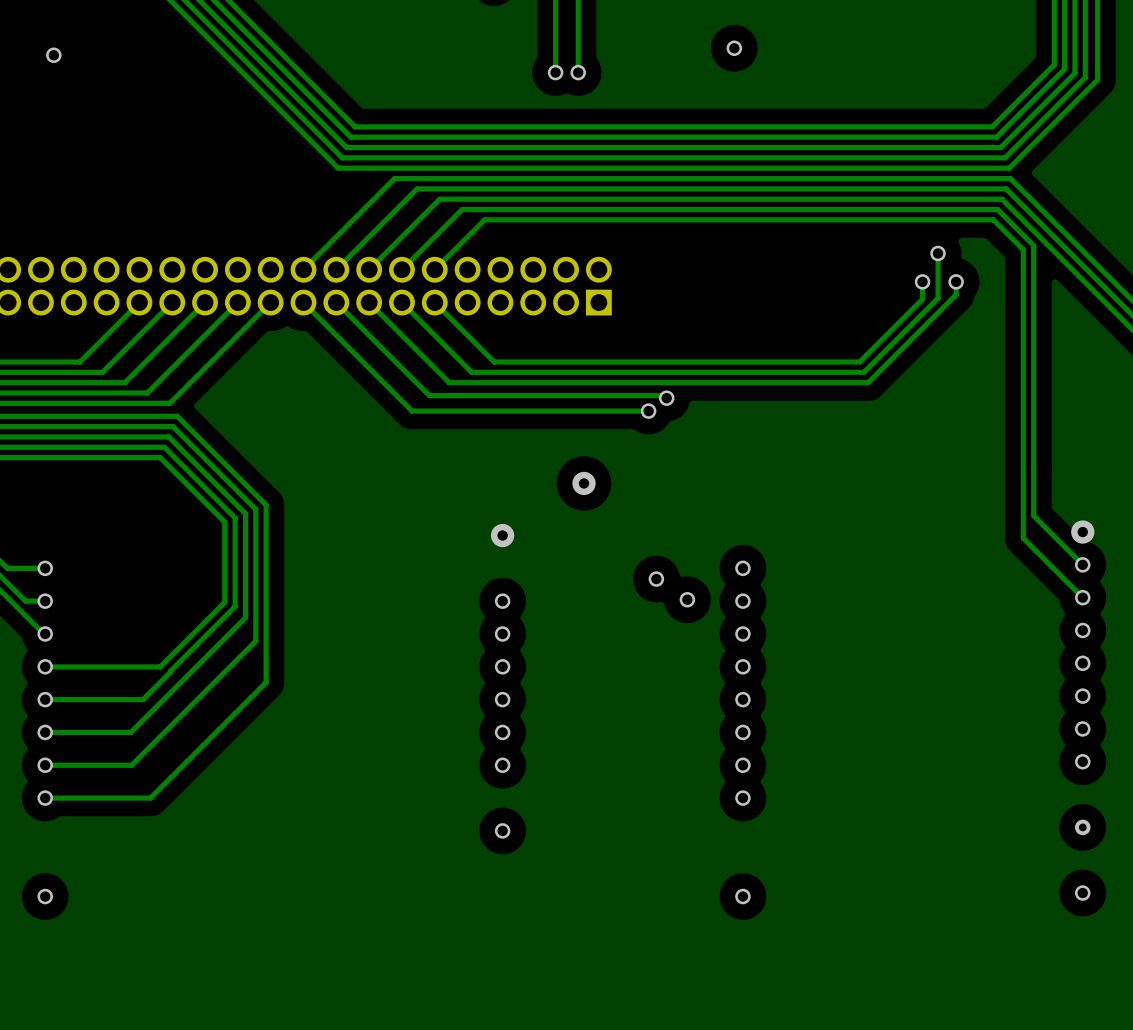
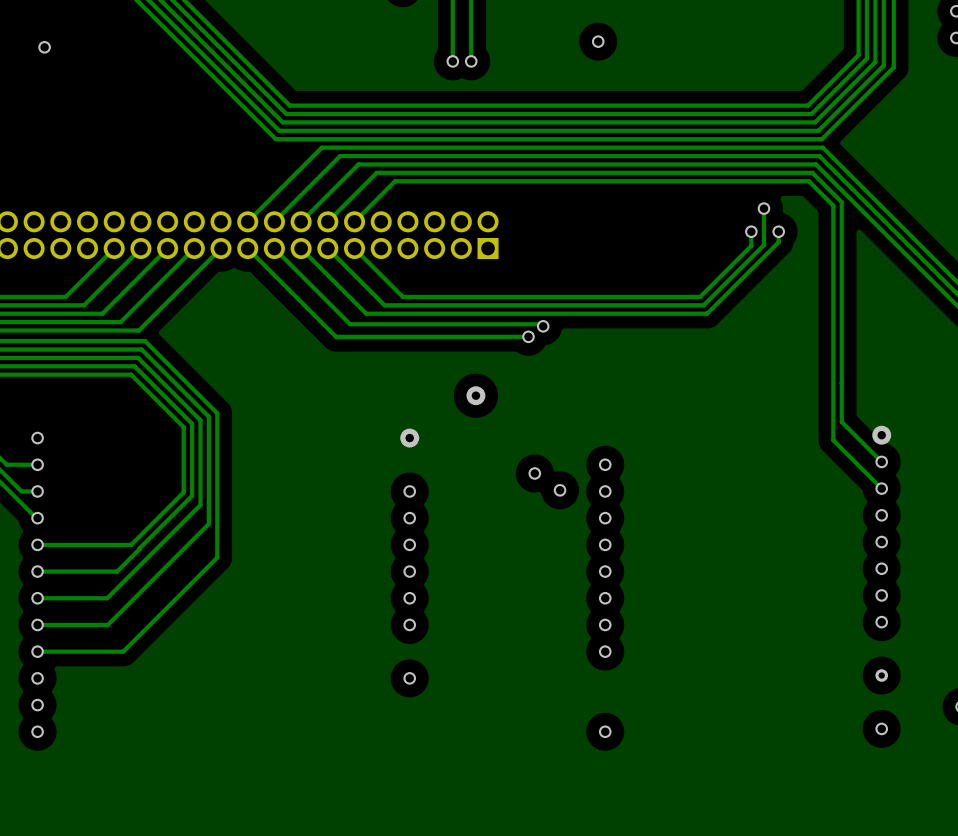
via: none -> (37, 438)
via: none -> (37, 678)
via: none -> (37, 705)

